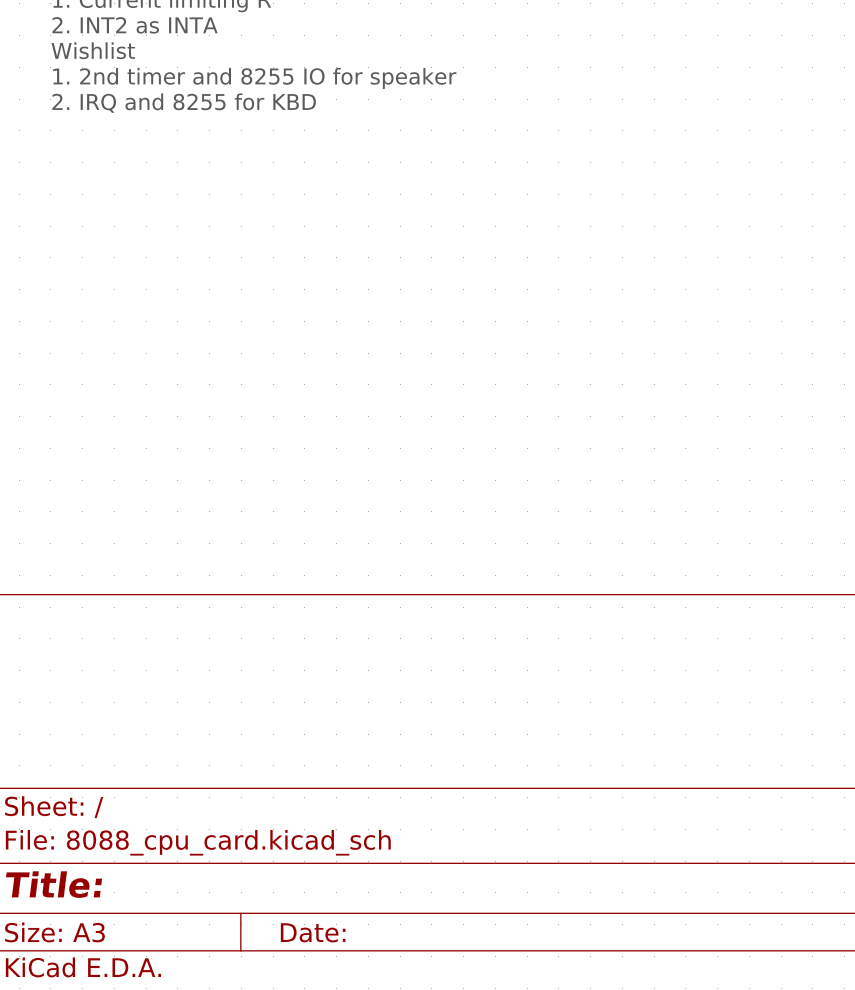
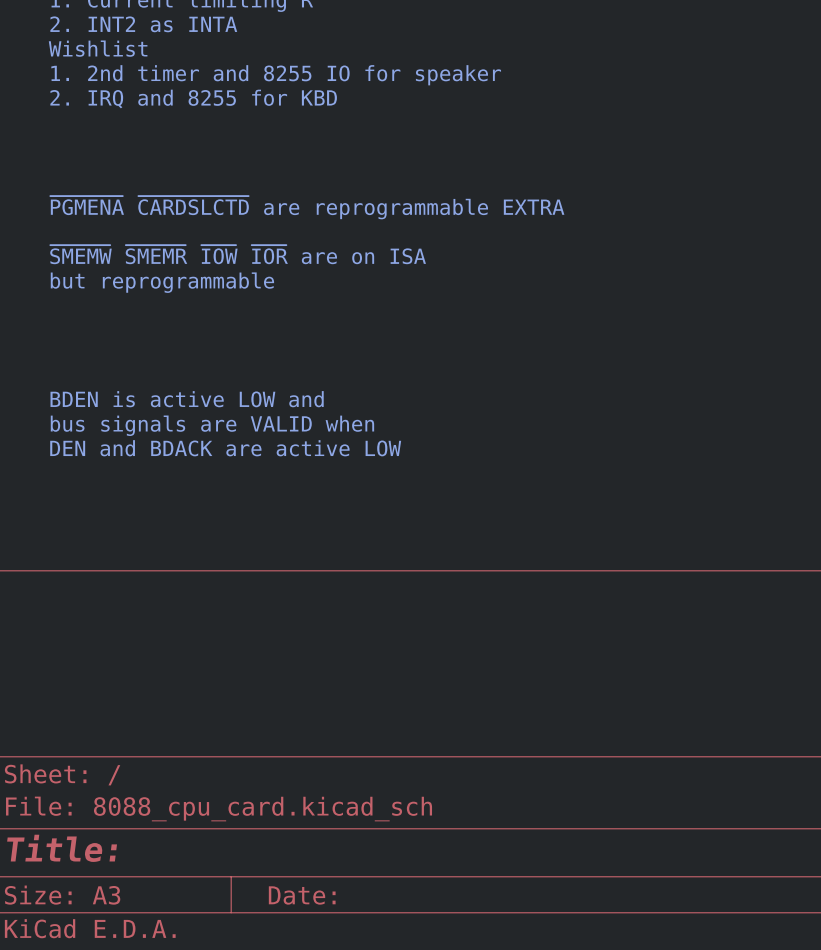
text: none -> ~{PGMENA} ~{CARDSLCTD} are reprogrammable EXTRA (307, 207)
text: none -> ~{SMEMW} ~{SMEMR} ~{IOW} ~{IOR} are on ISA (238, 254)
text: none -> but reprogrammable (162, 282)
text: none -> BDEN is active LOW and (187, 399)
text: none -> bus signals are VALID when (212, 425)
text: none -> DEN and BDACK are active LOW (225, 448)

